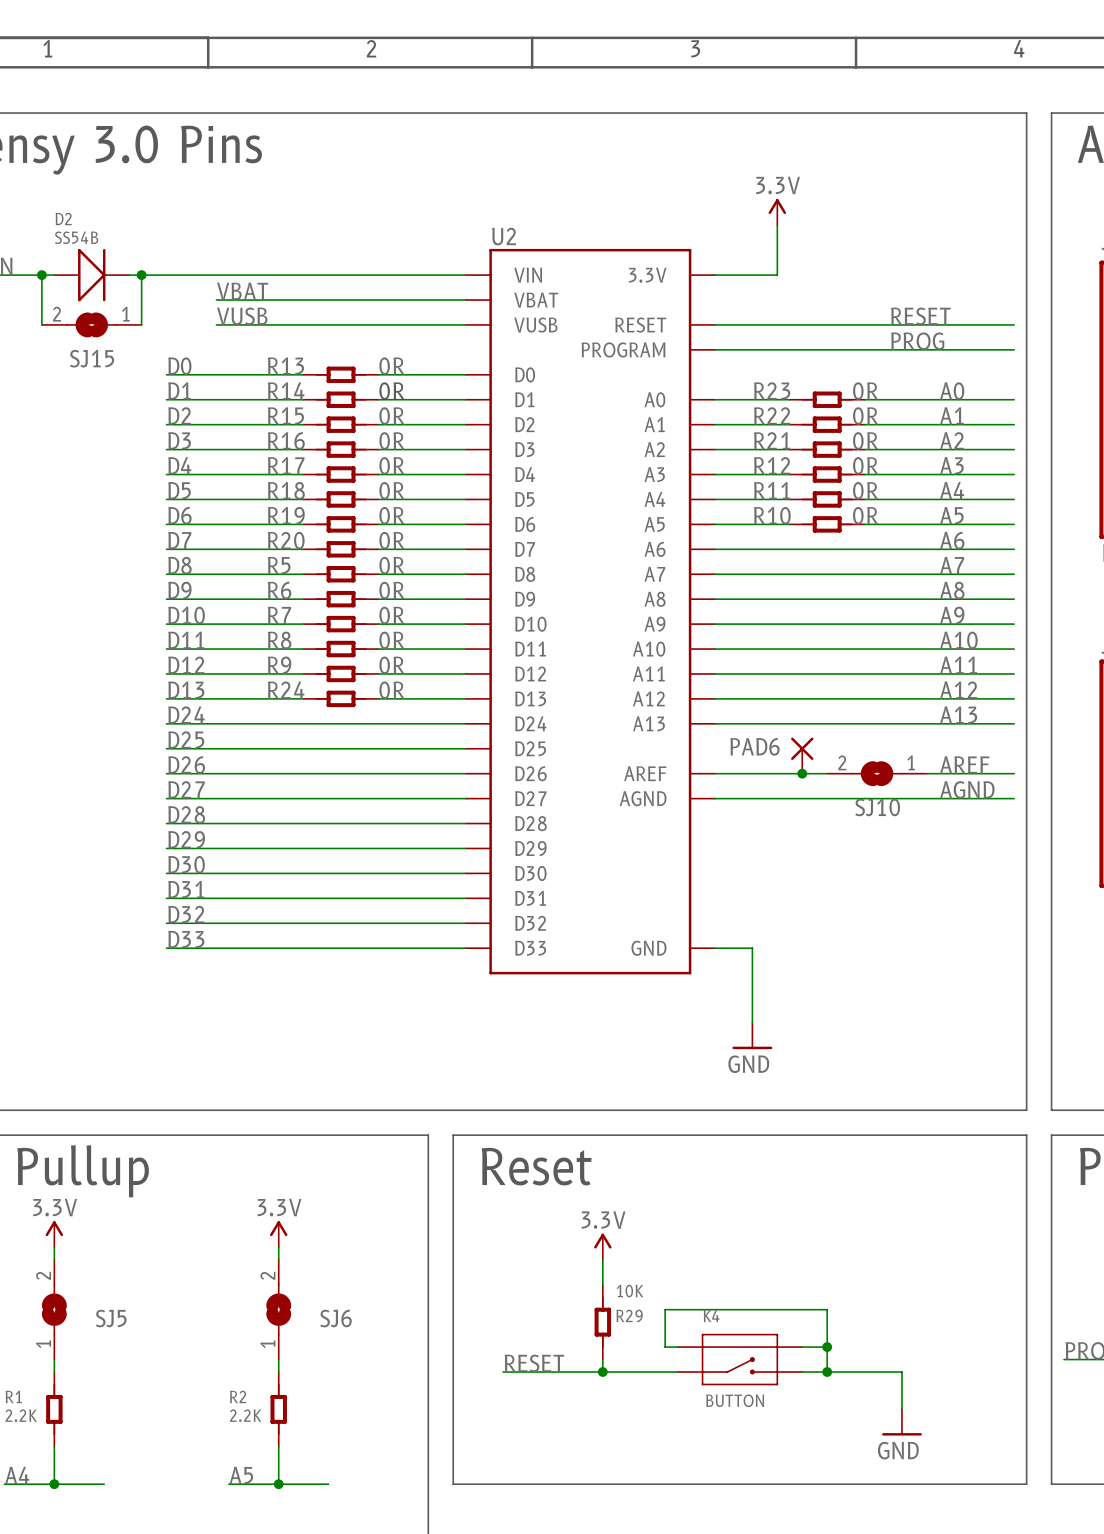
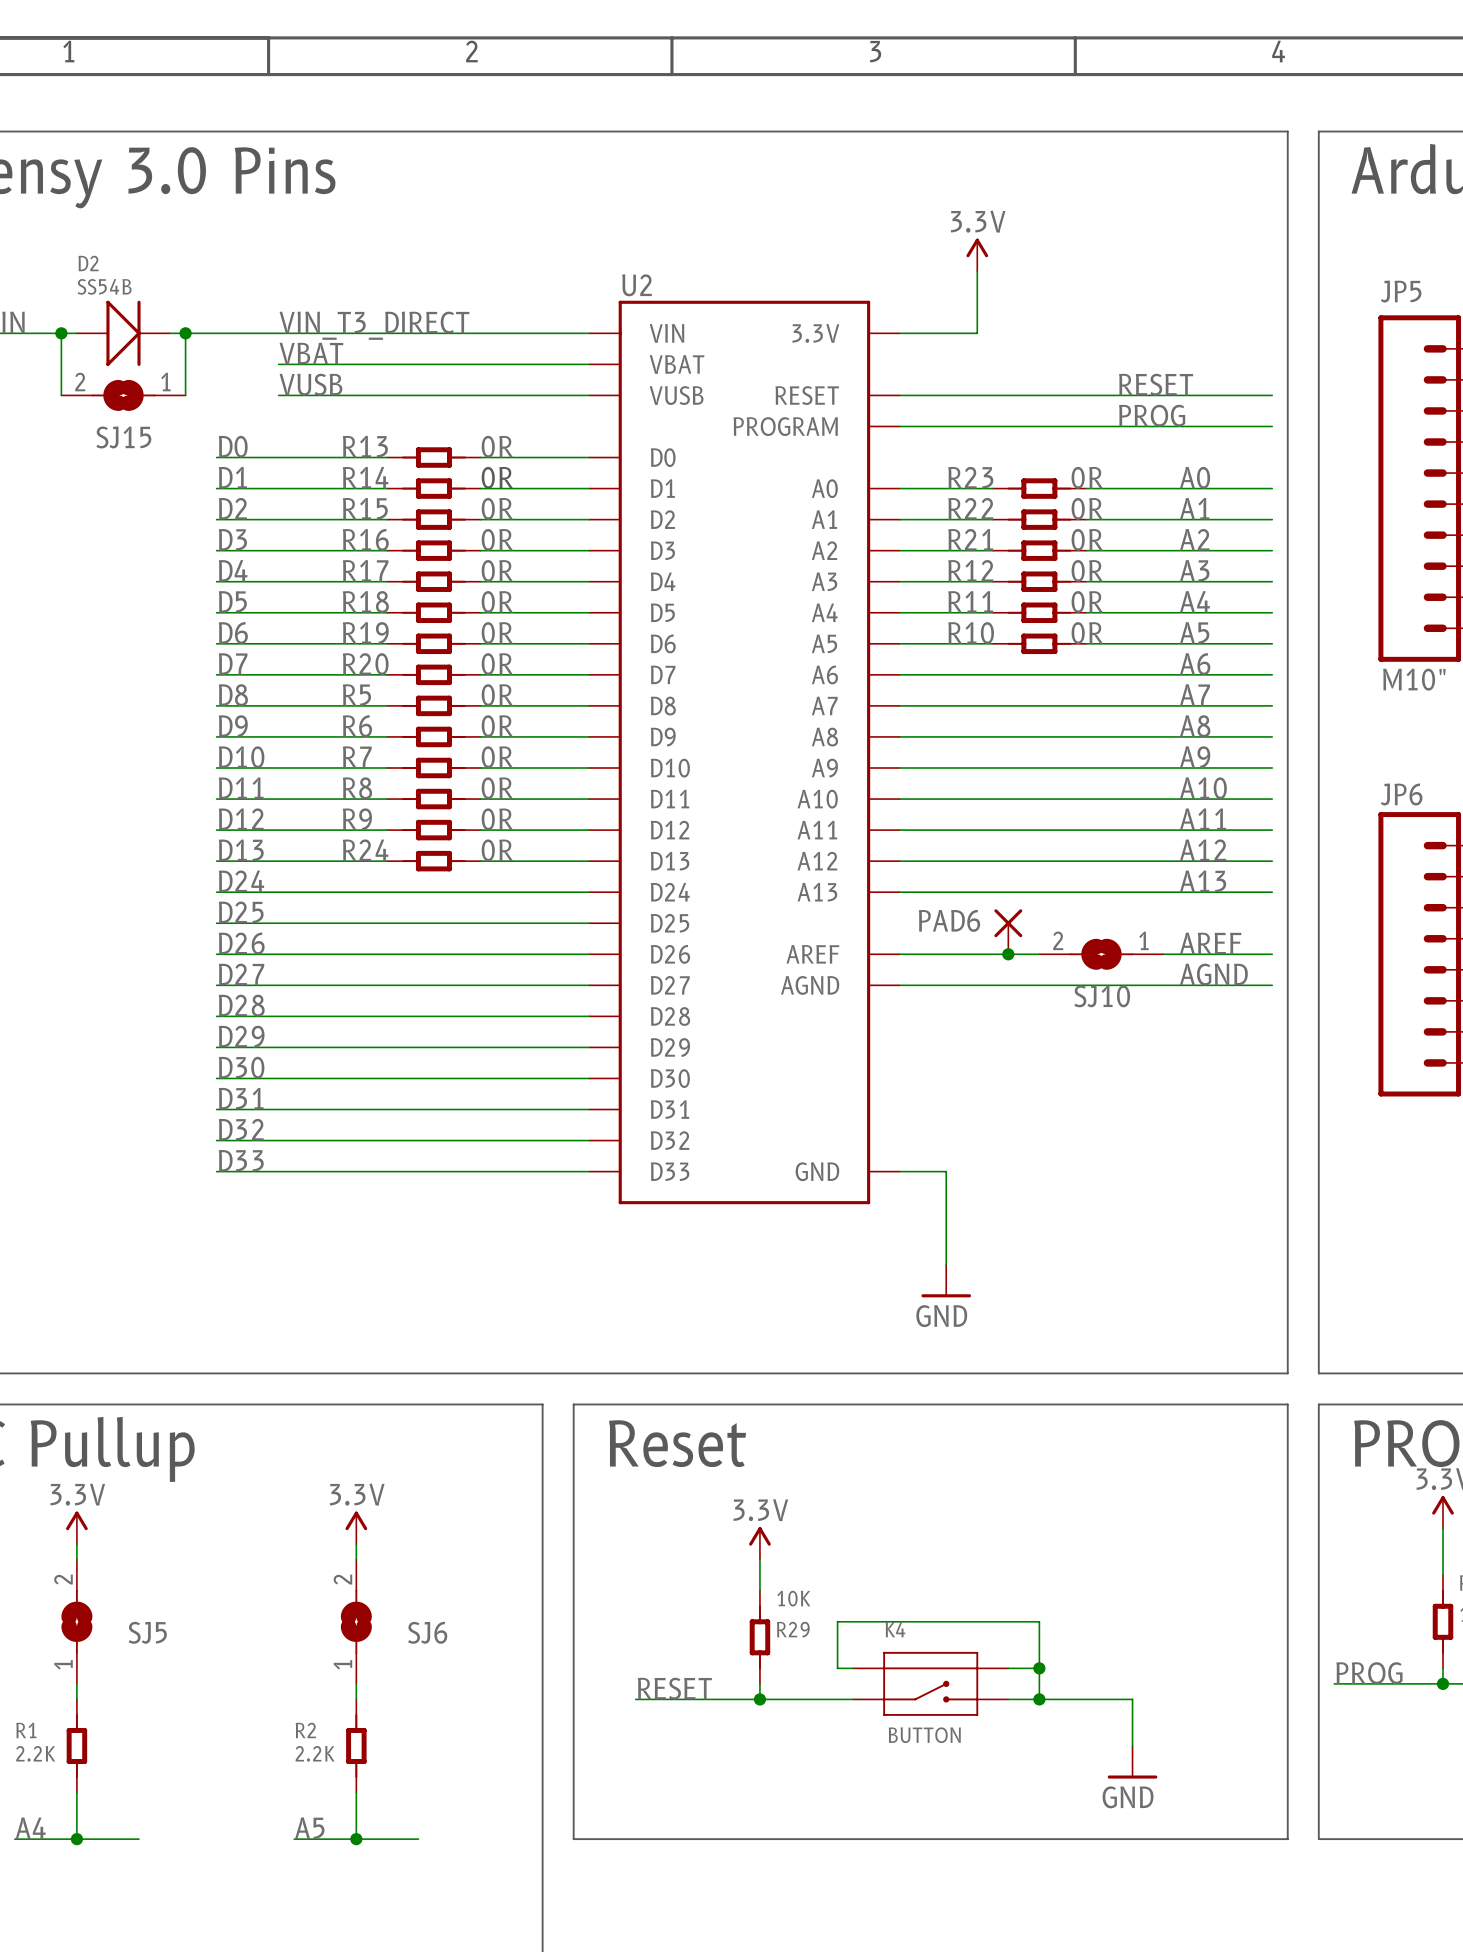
label: none -> VIN_T3_DIRECT (374, 325)

